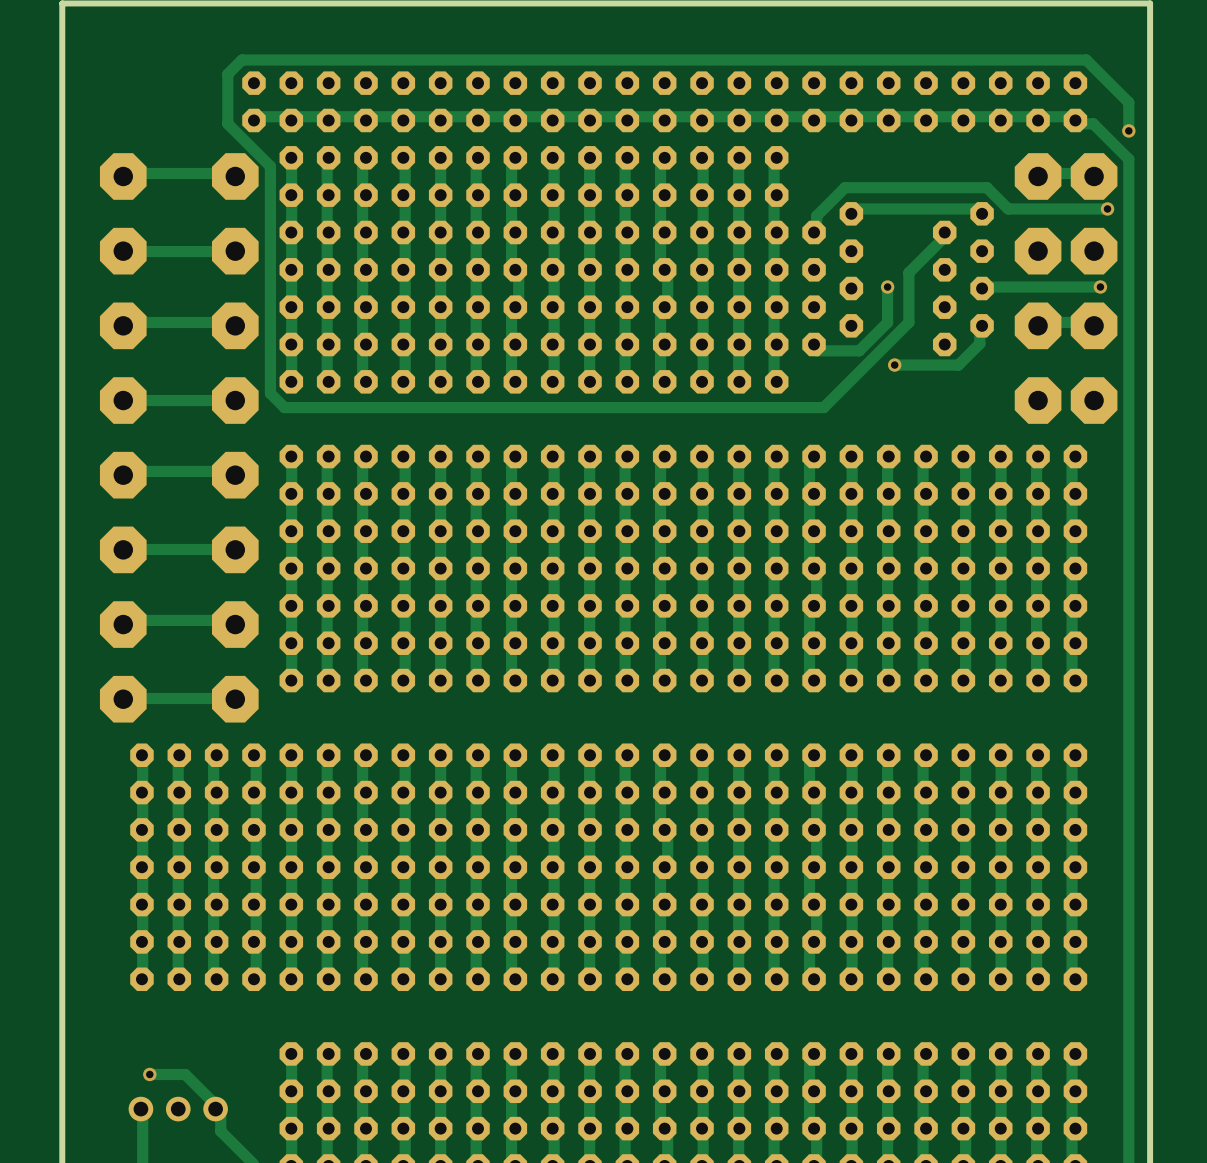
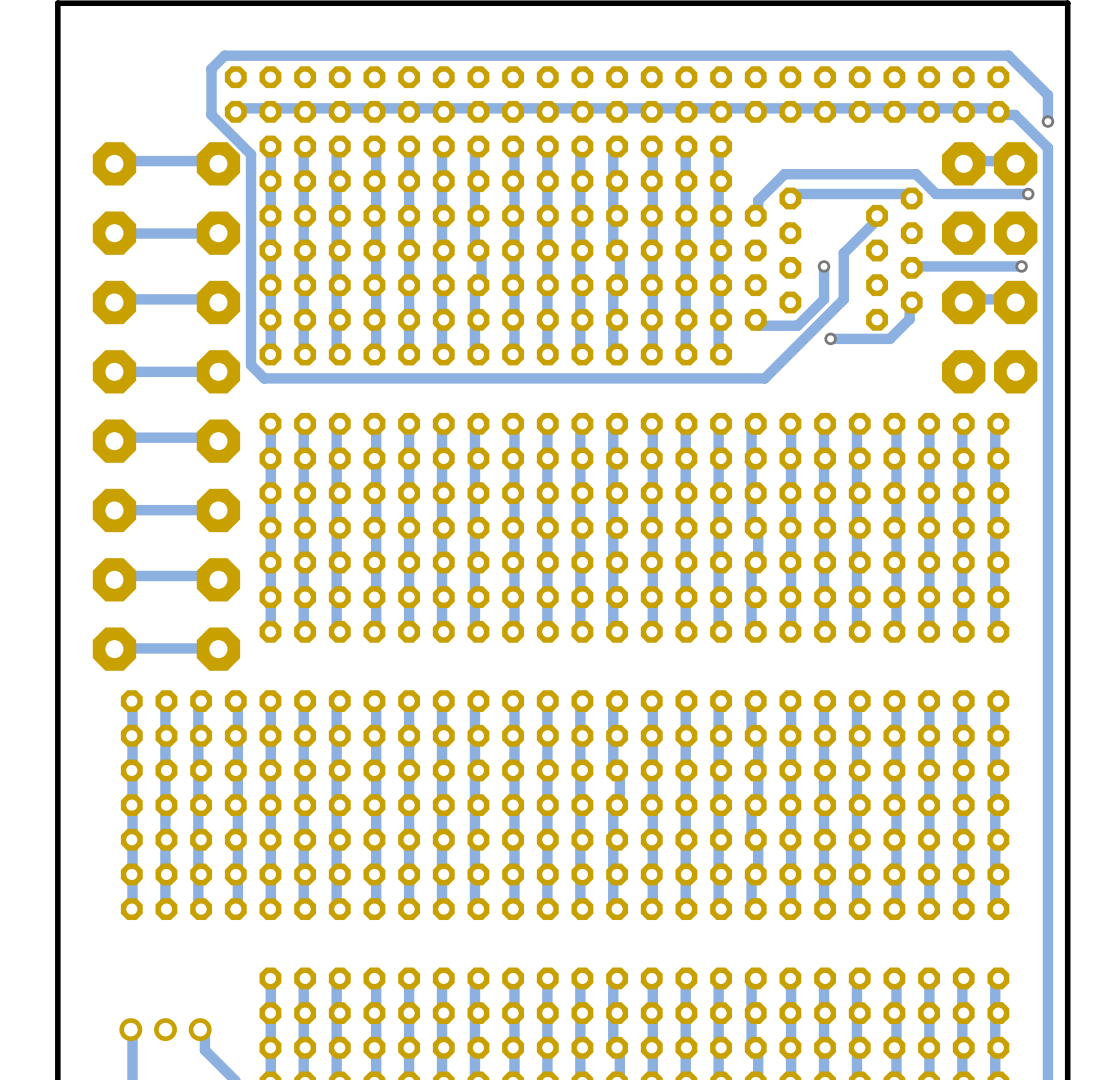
track: (149, 1074) (185, 1074) (213, 1102) (215, 1109) -> none
via: (149, 1074) -> none

